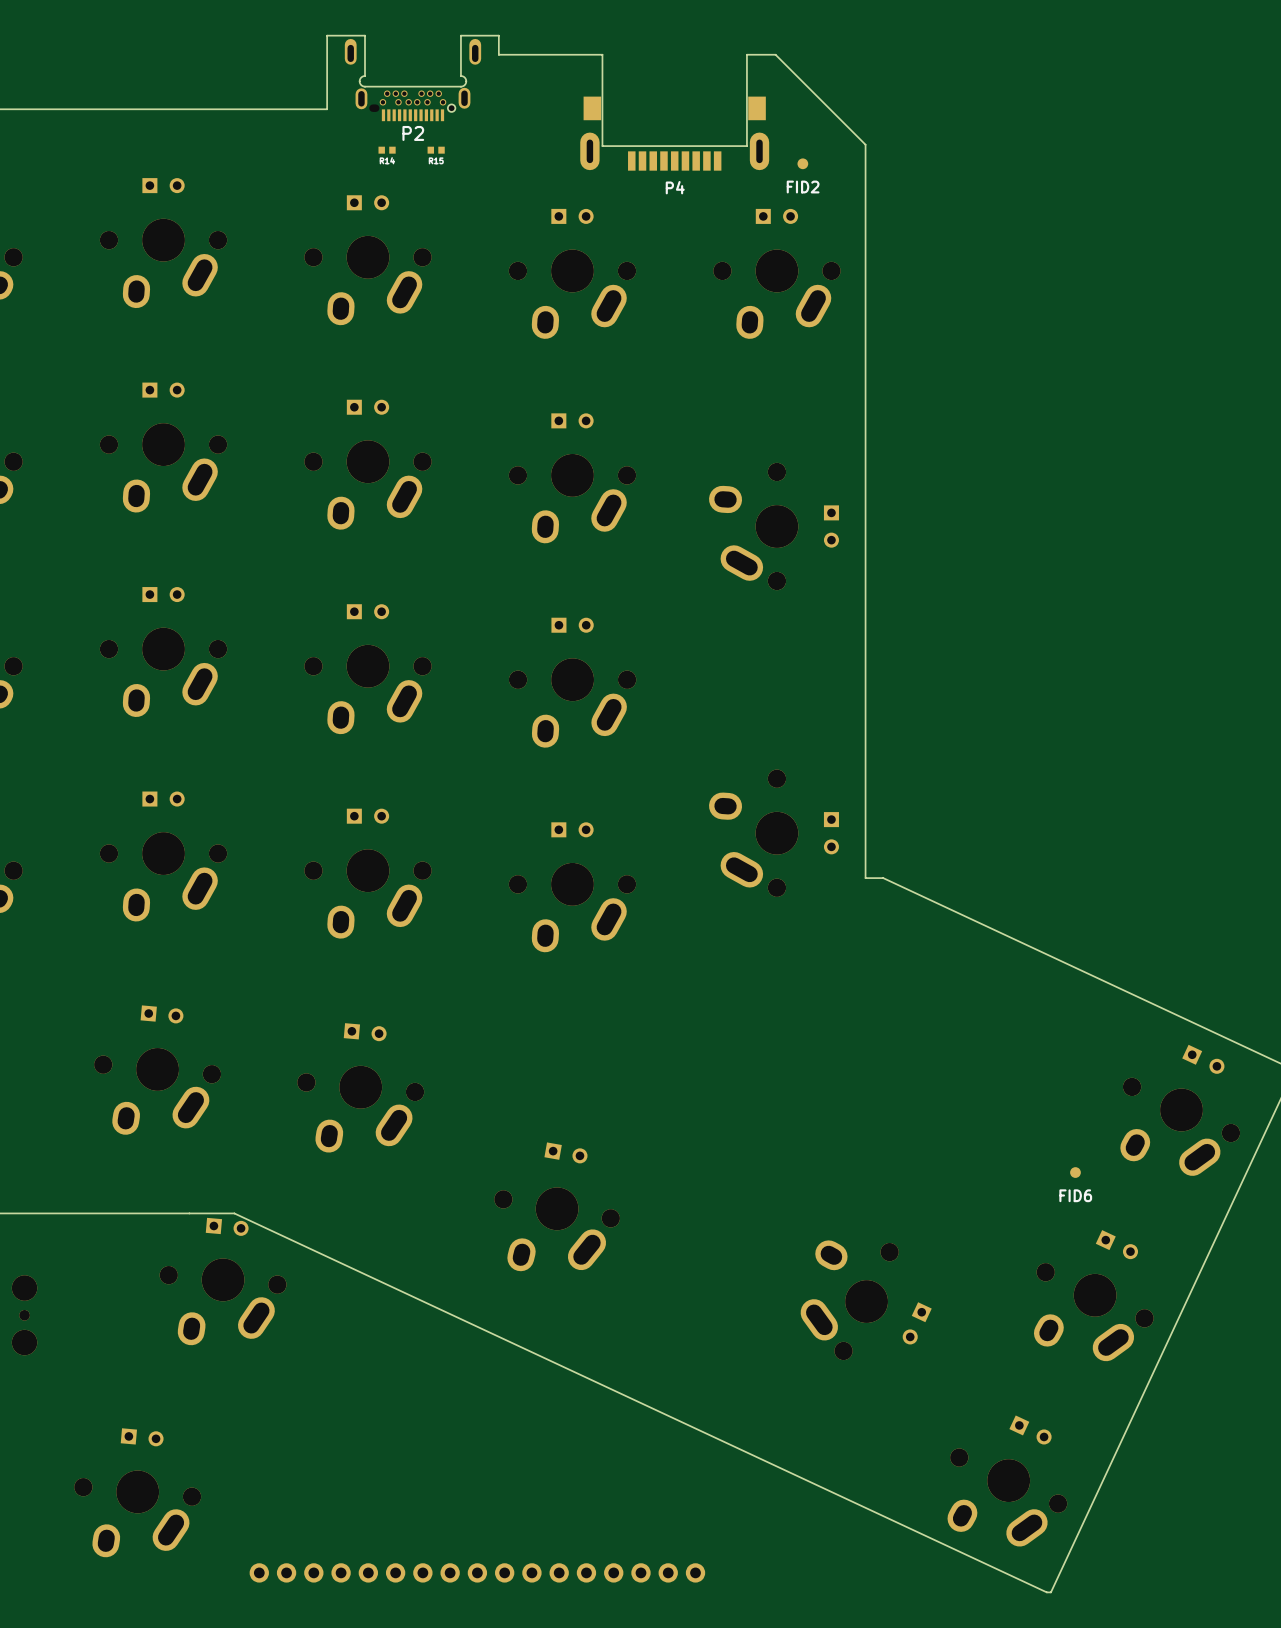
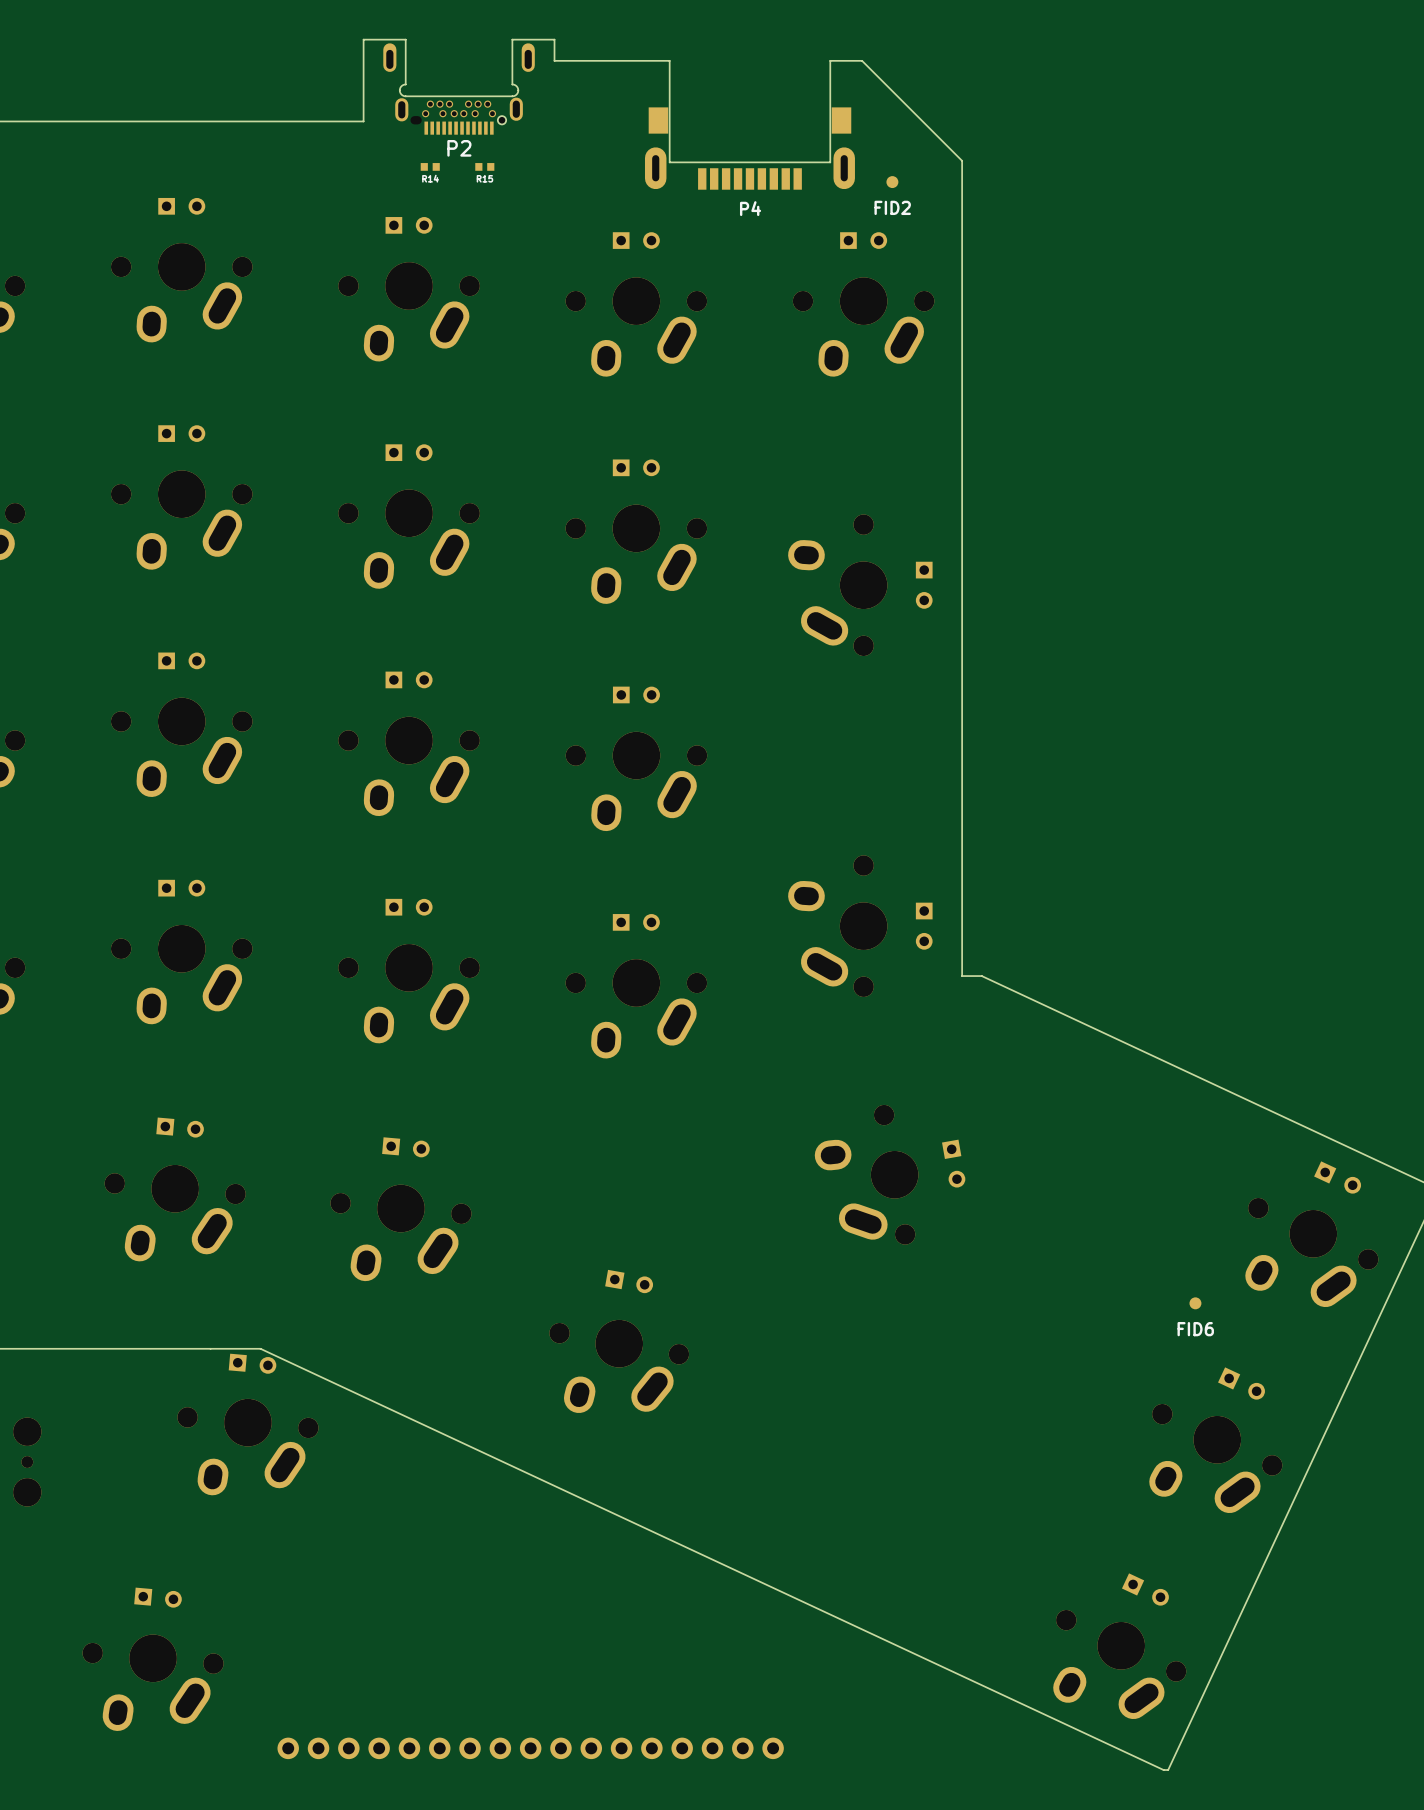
part: none -> (953, 1163)
part: none -> (866, 1174)
part: (849, 1300) -> none
part: (917, 1323) -> none

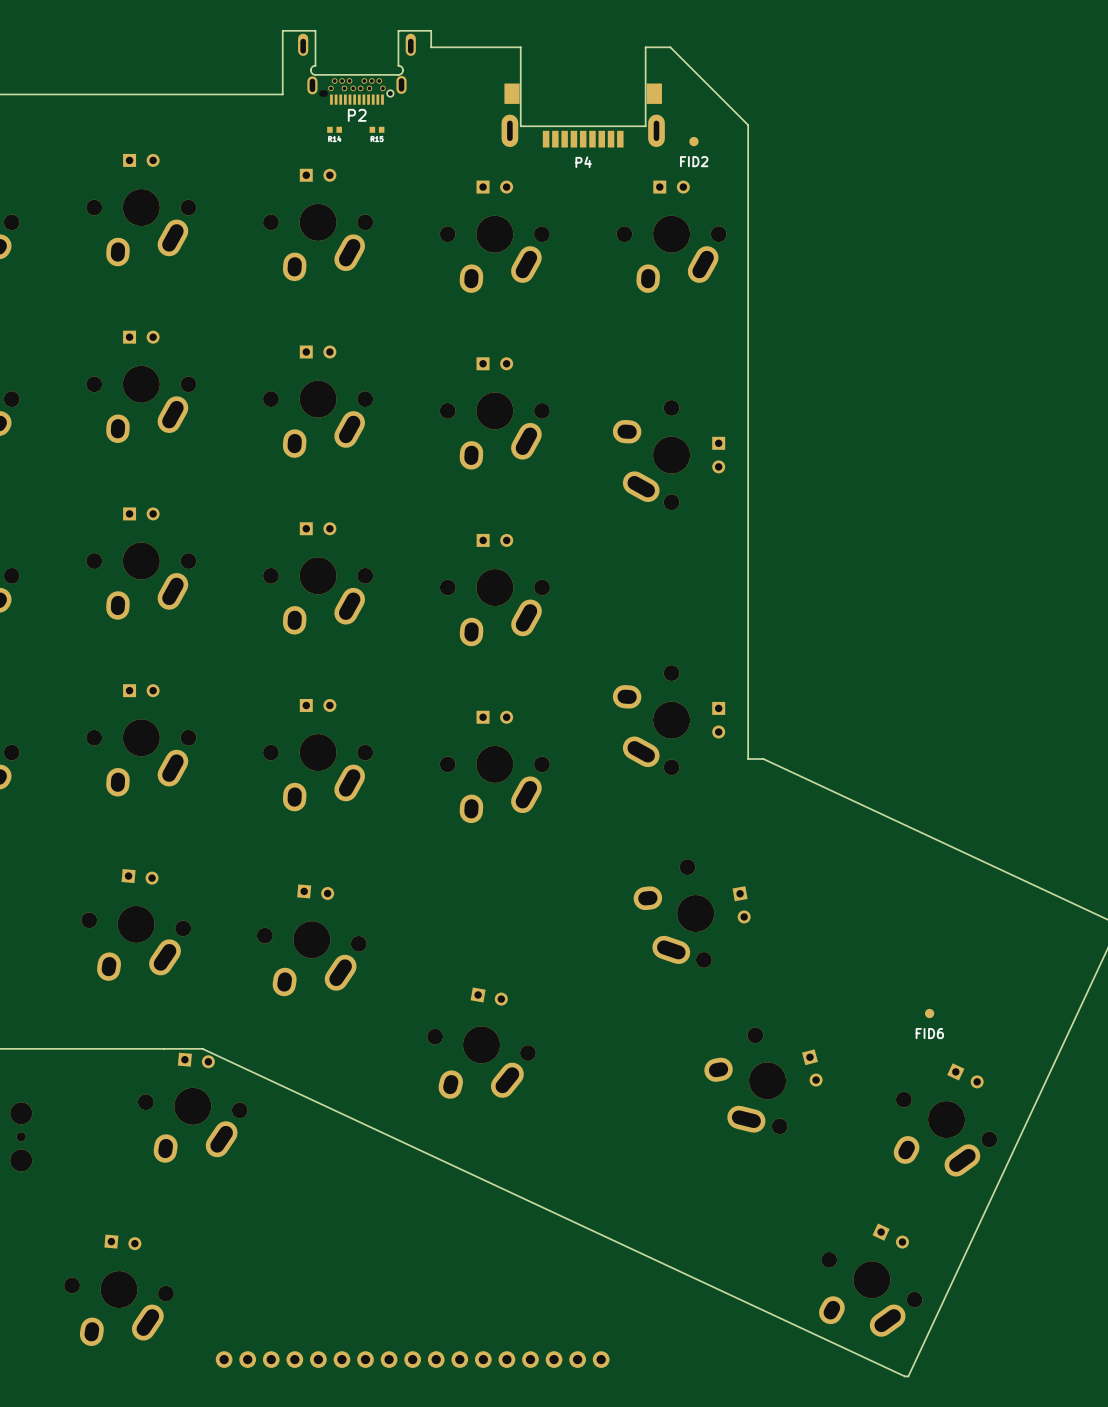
part: (1337, 1177) -> none
part: (1311, 1252) -> none
part: none -> (812, 1067)
part: none -> (745, 1080)

